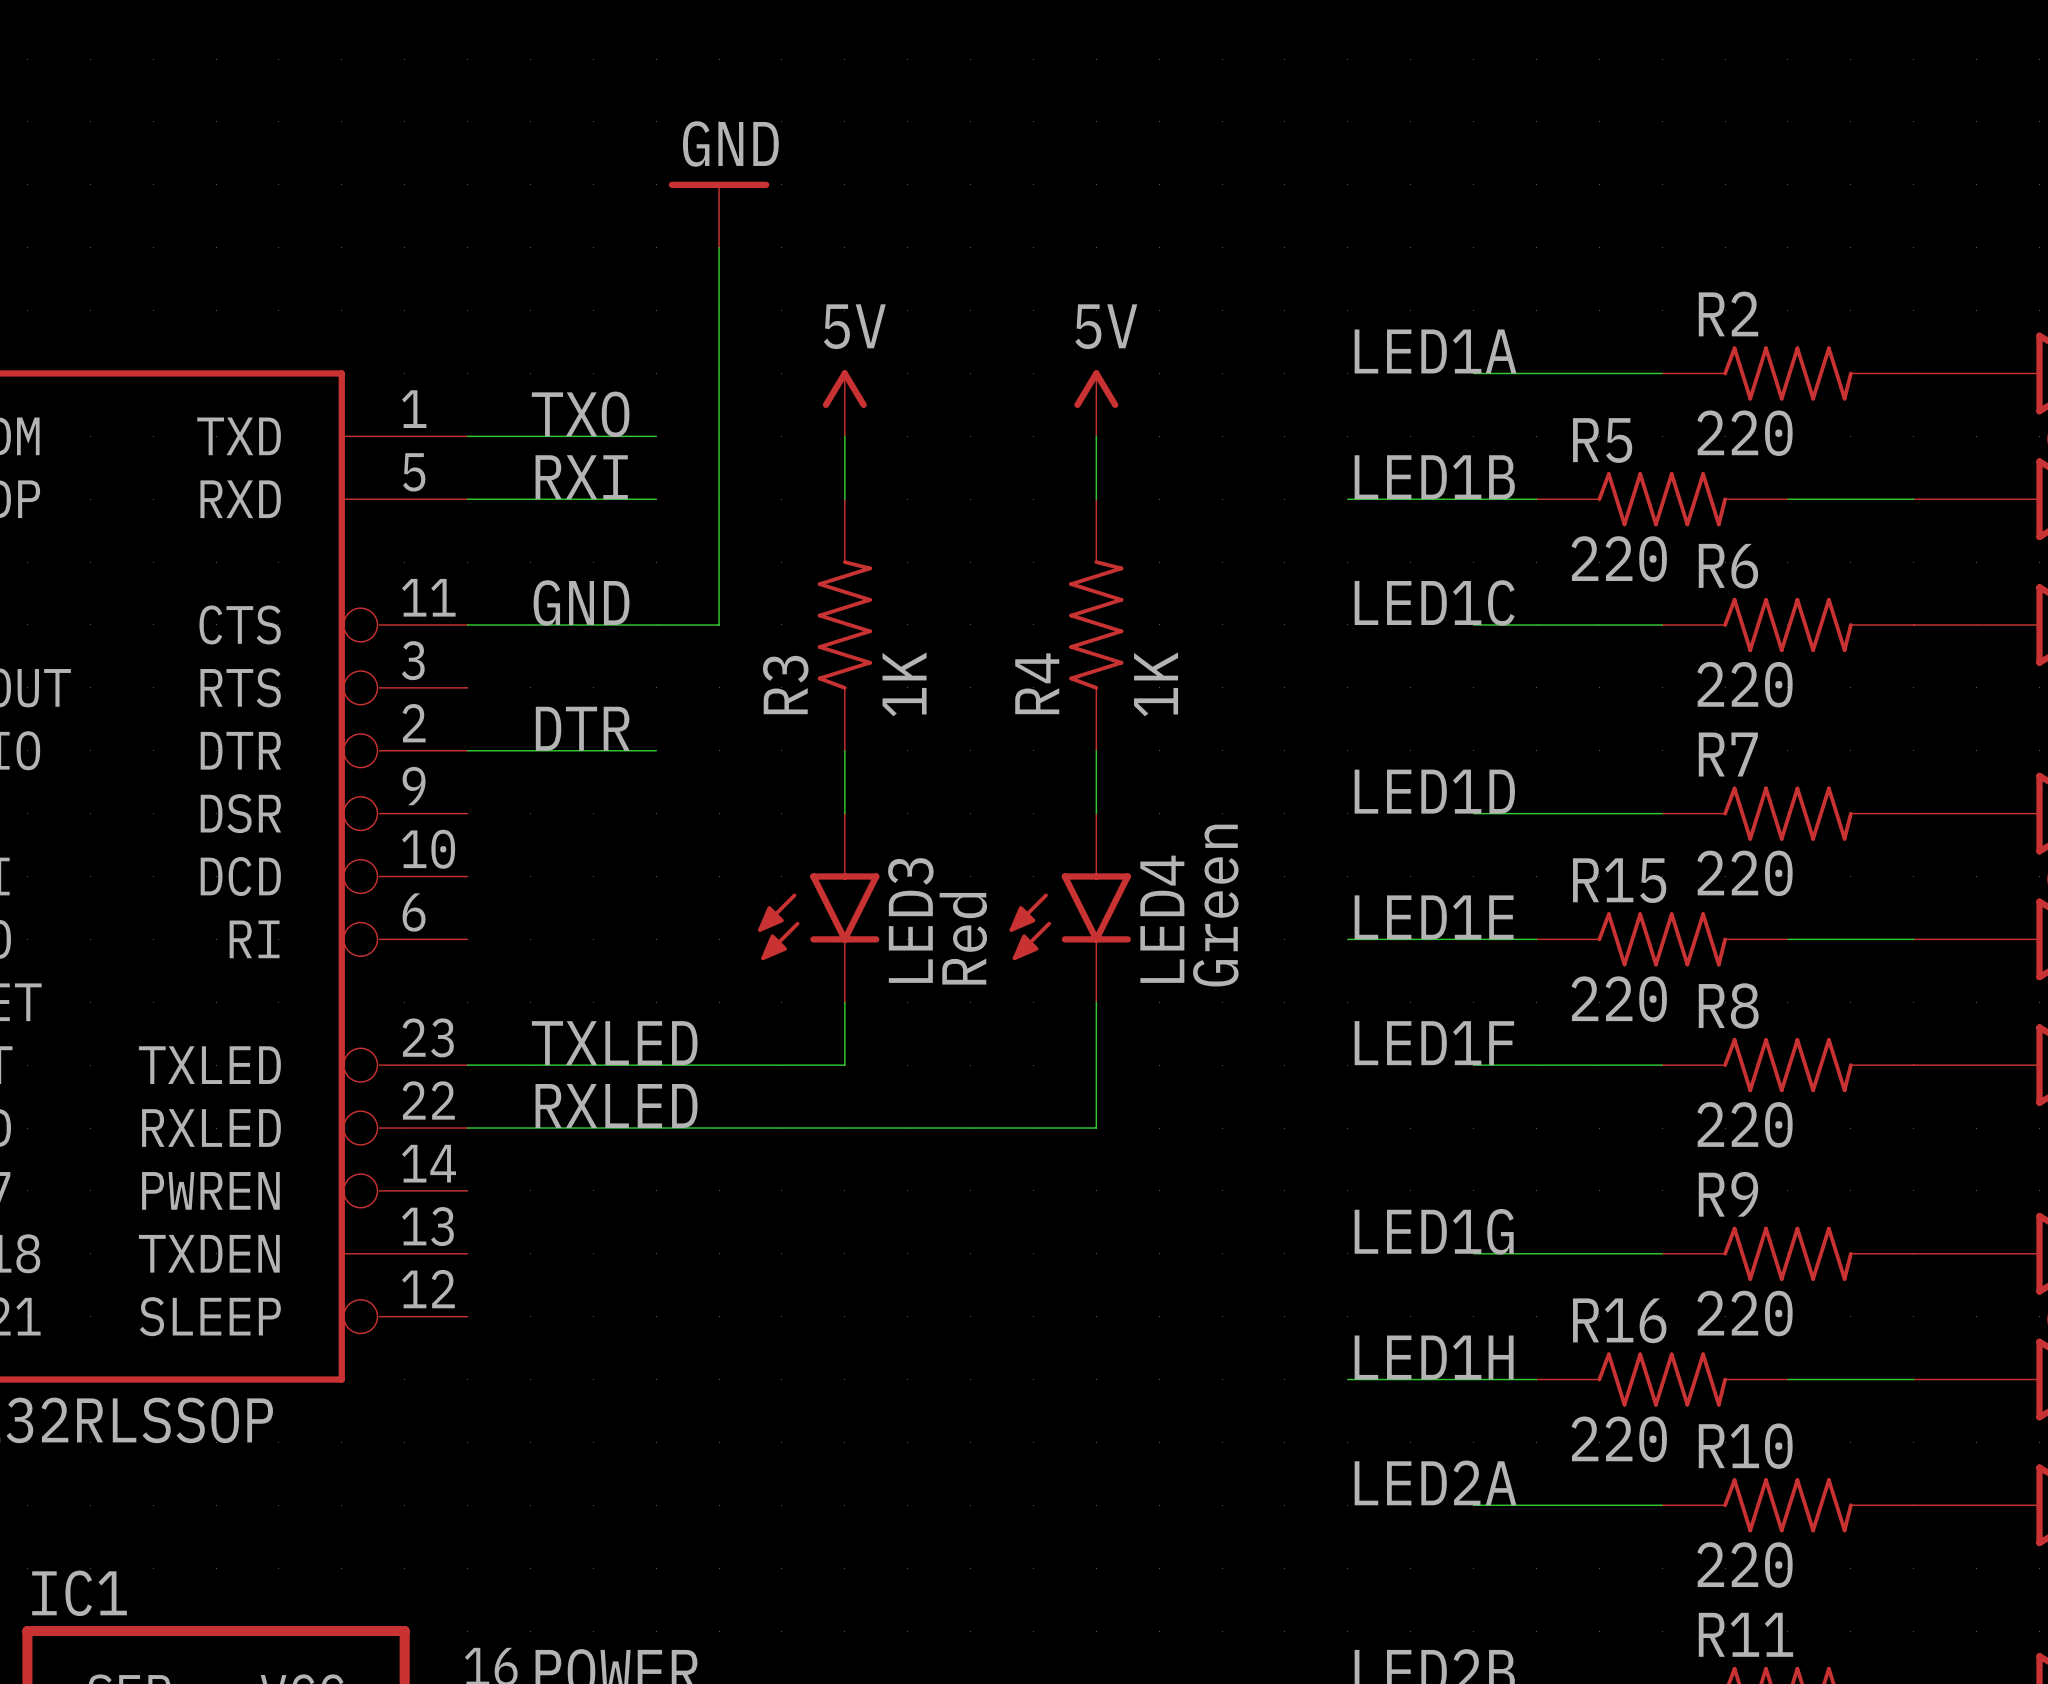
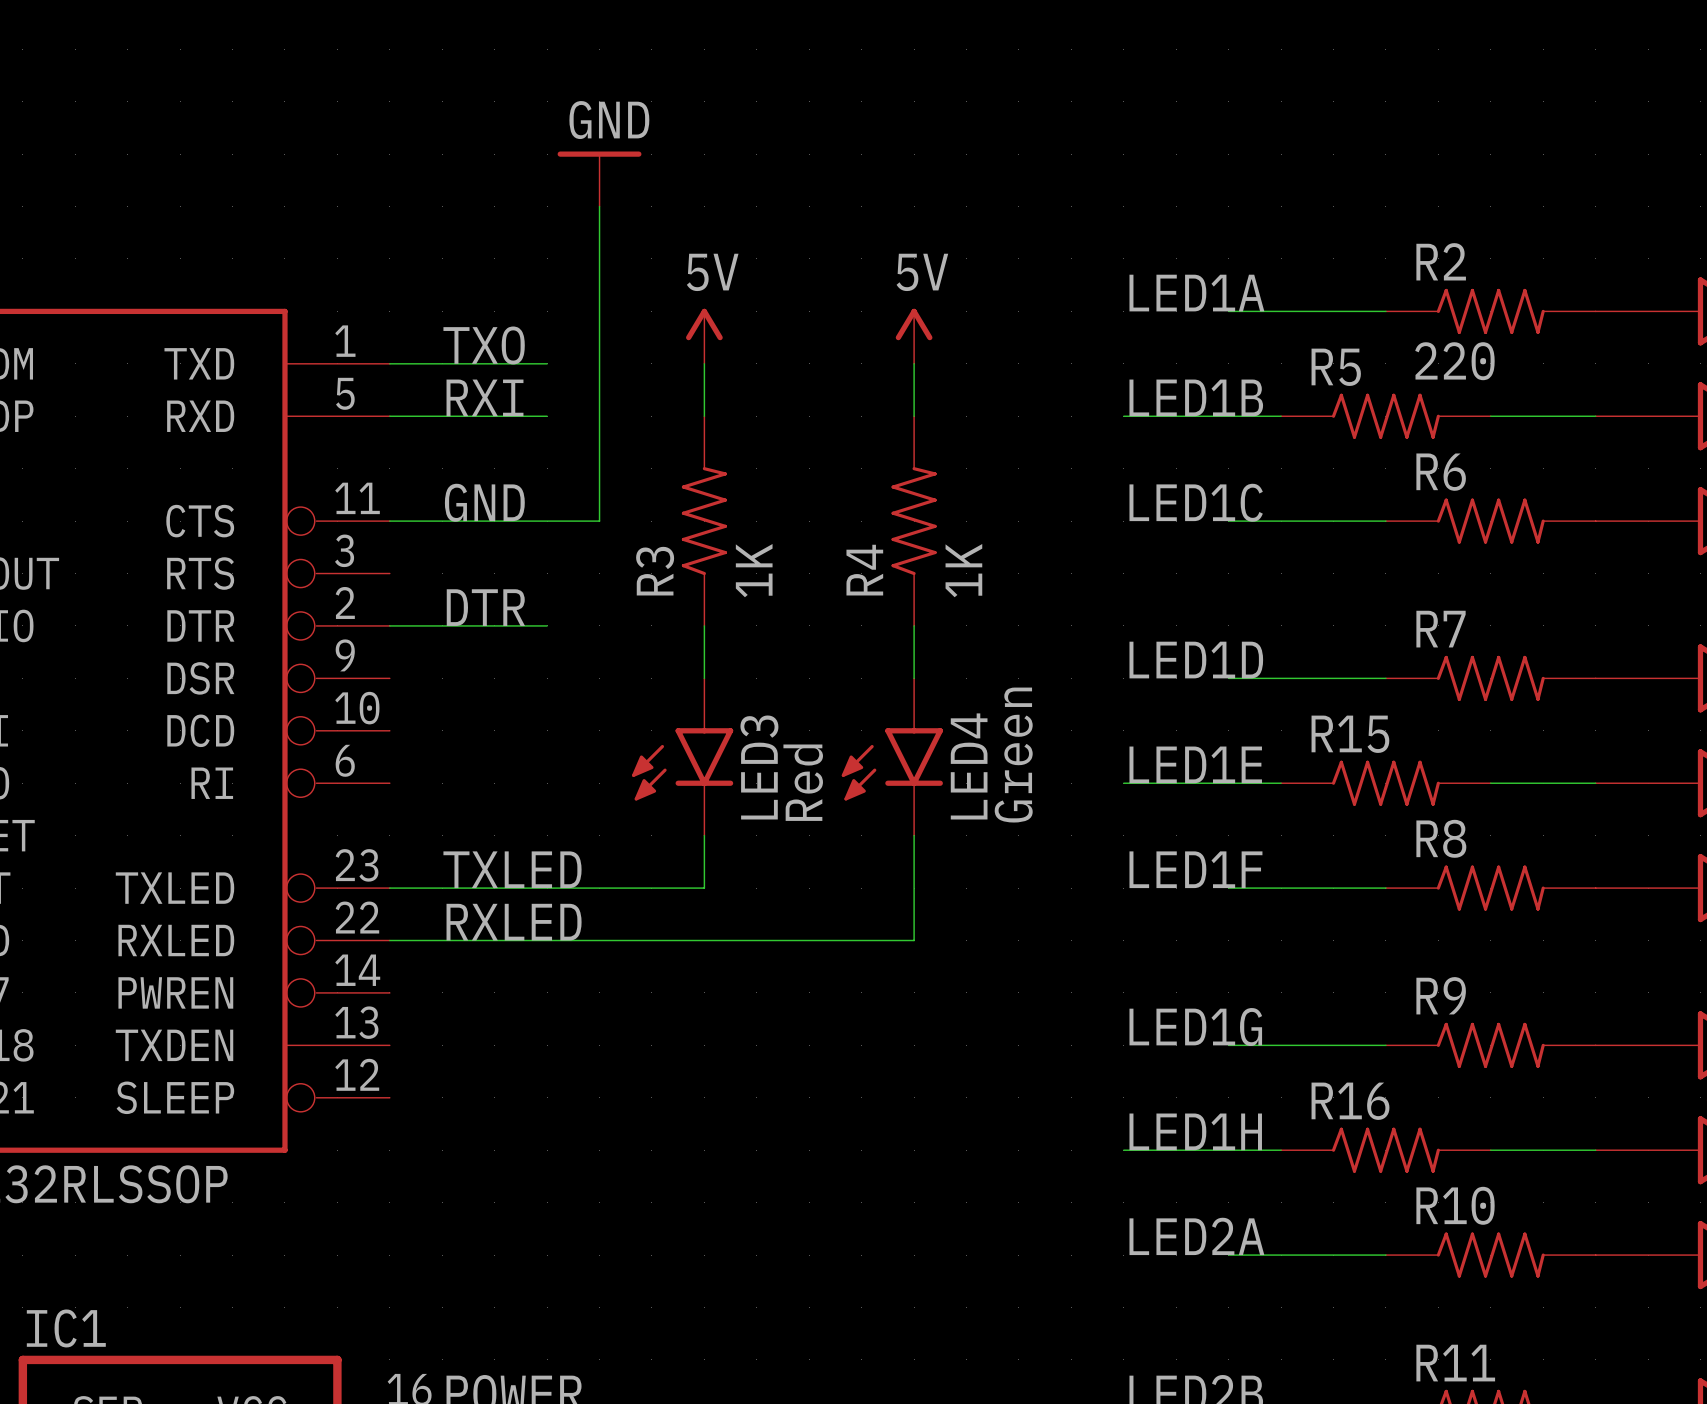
R5 value: 220 (1619, 558) -> none
R6 value: 220 (1745, 684) -> none
R7 value: 220 (1745, 873) -> none
R15 value: 220 (1619, 999) -> none
R8 value: 220 (1745, 1124) -> none
R9 value: 220 (1745, 1313) -> none
R16 value: 220 (1619, 1439) -> none
R10 value: 220 (1745, 1565) -> none

